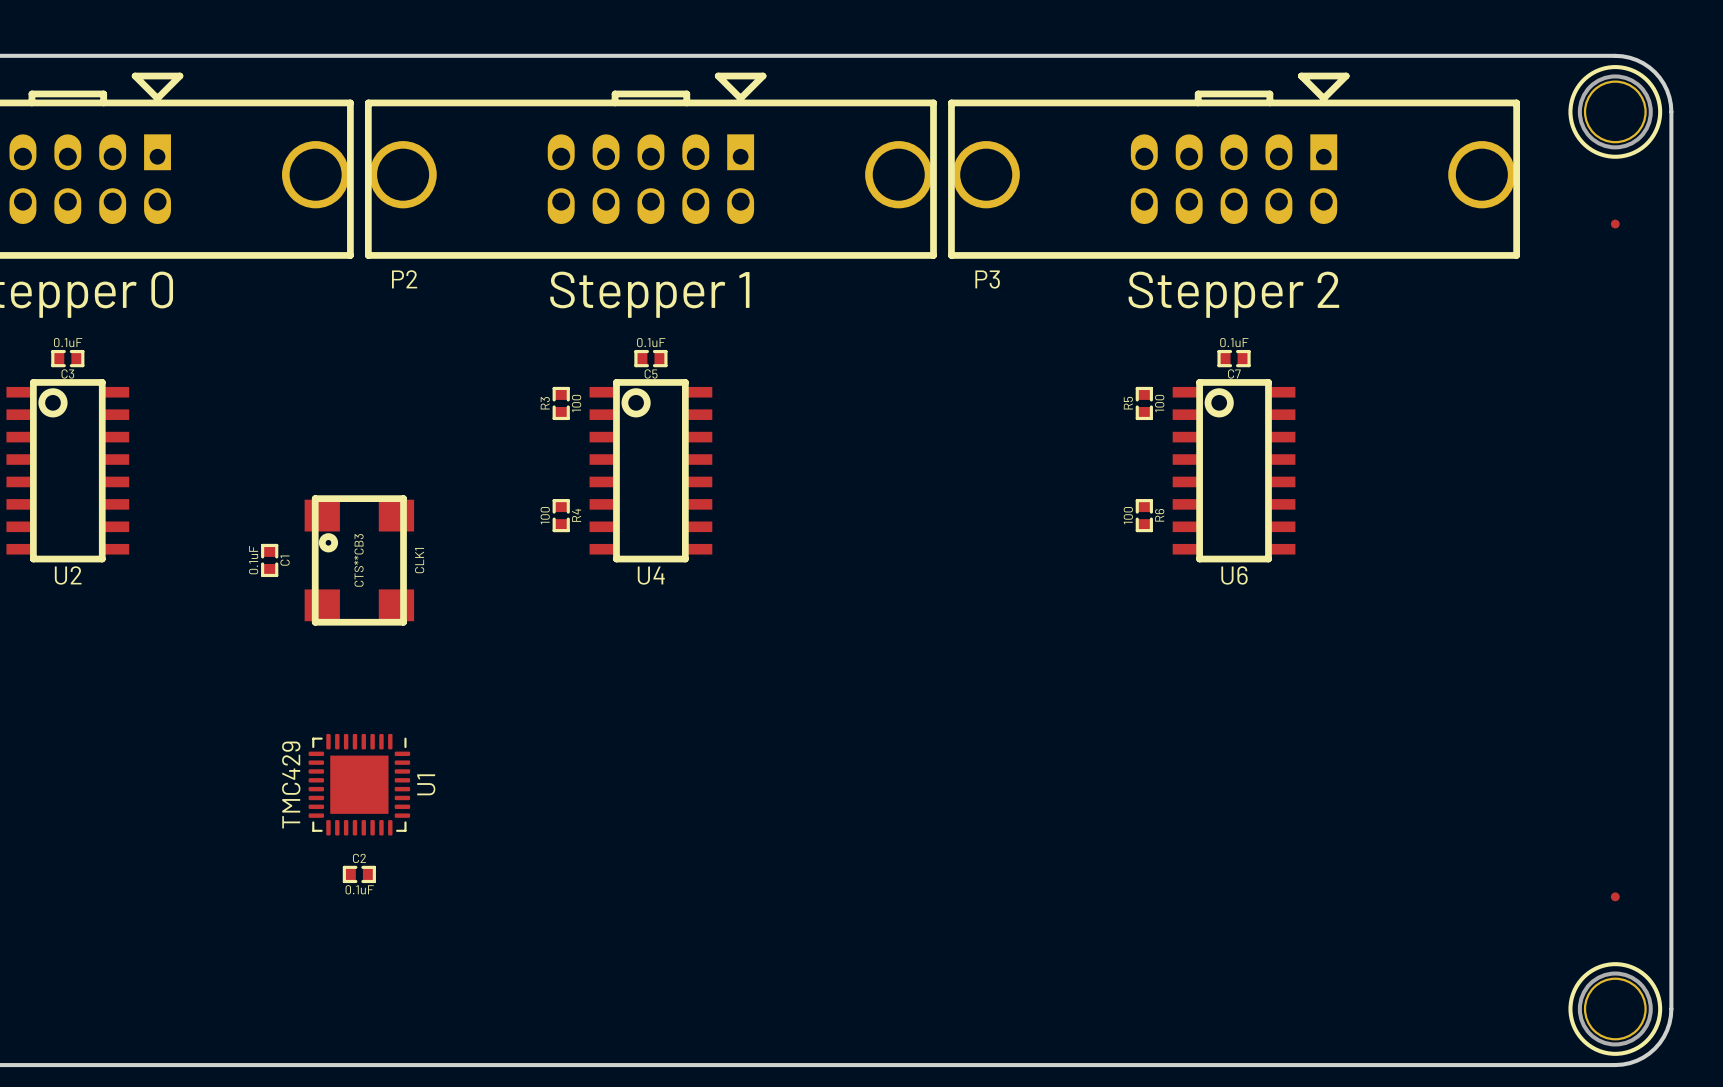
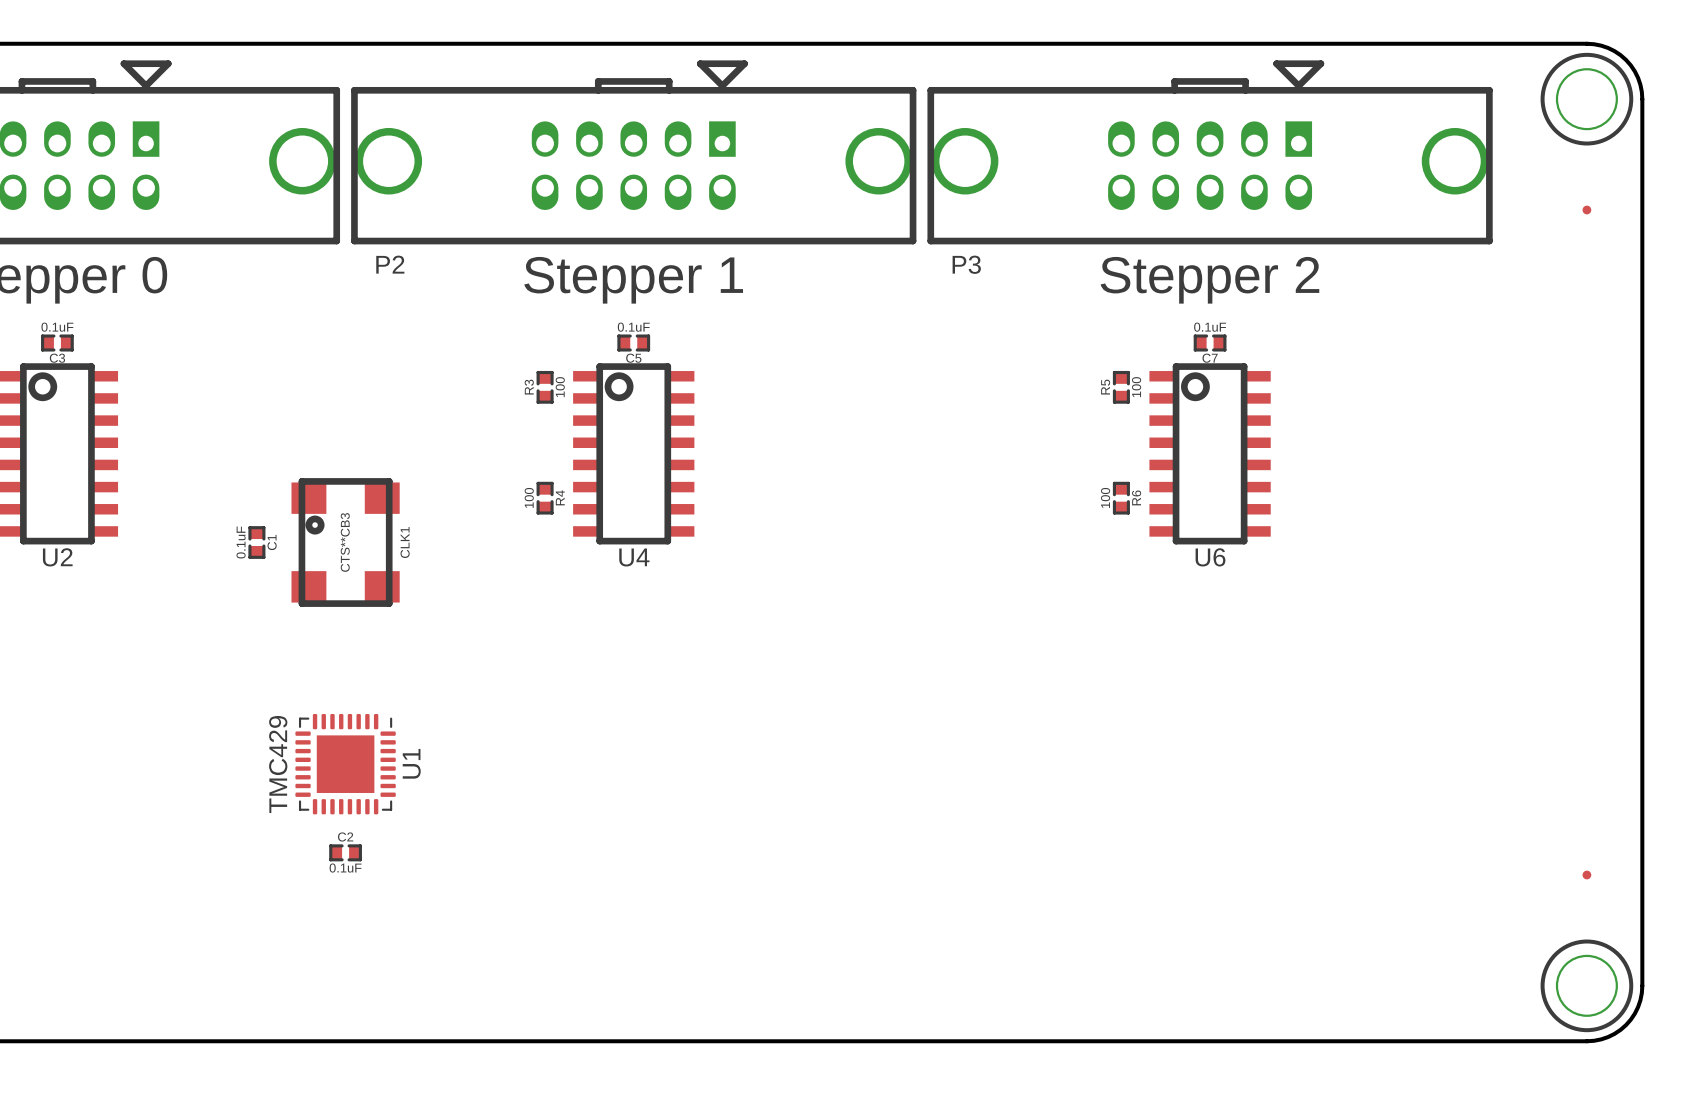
drawing: [1577, 74, 1653, 150] -> none
drawing: [1577, 971, 1653, 1047] -> none

